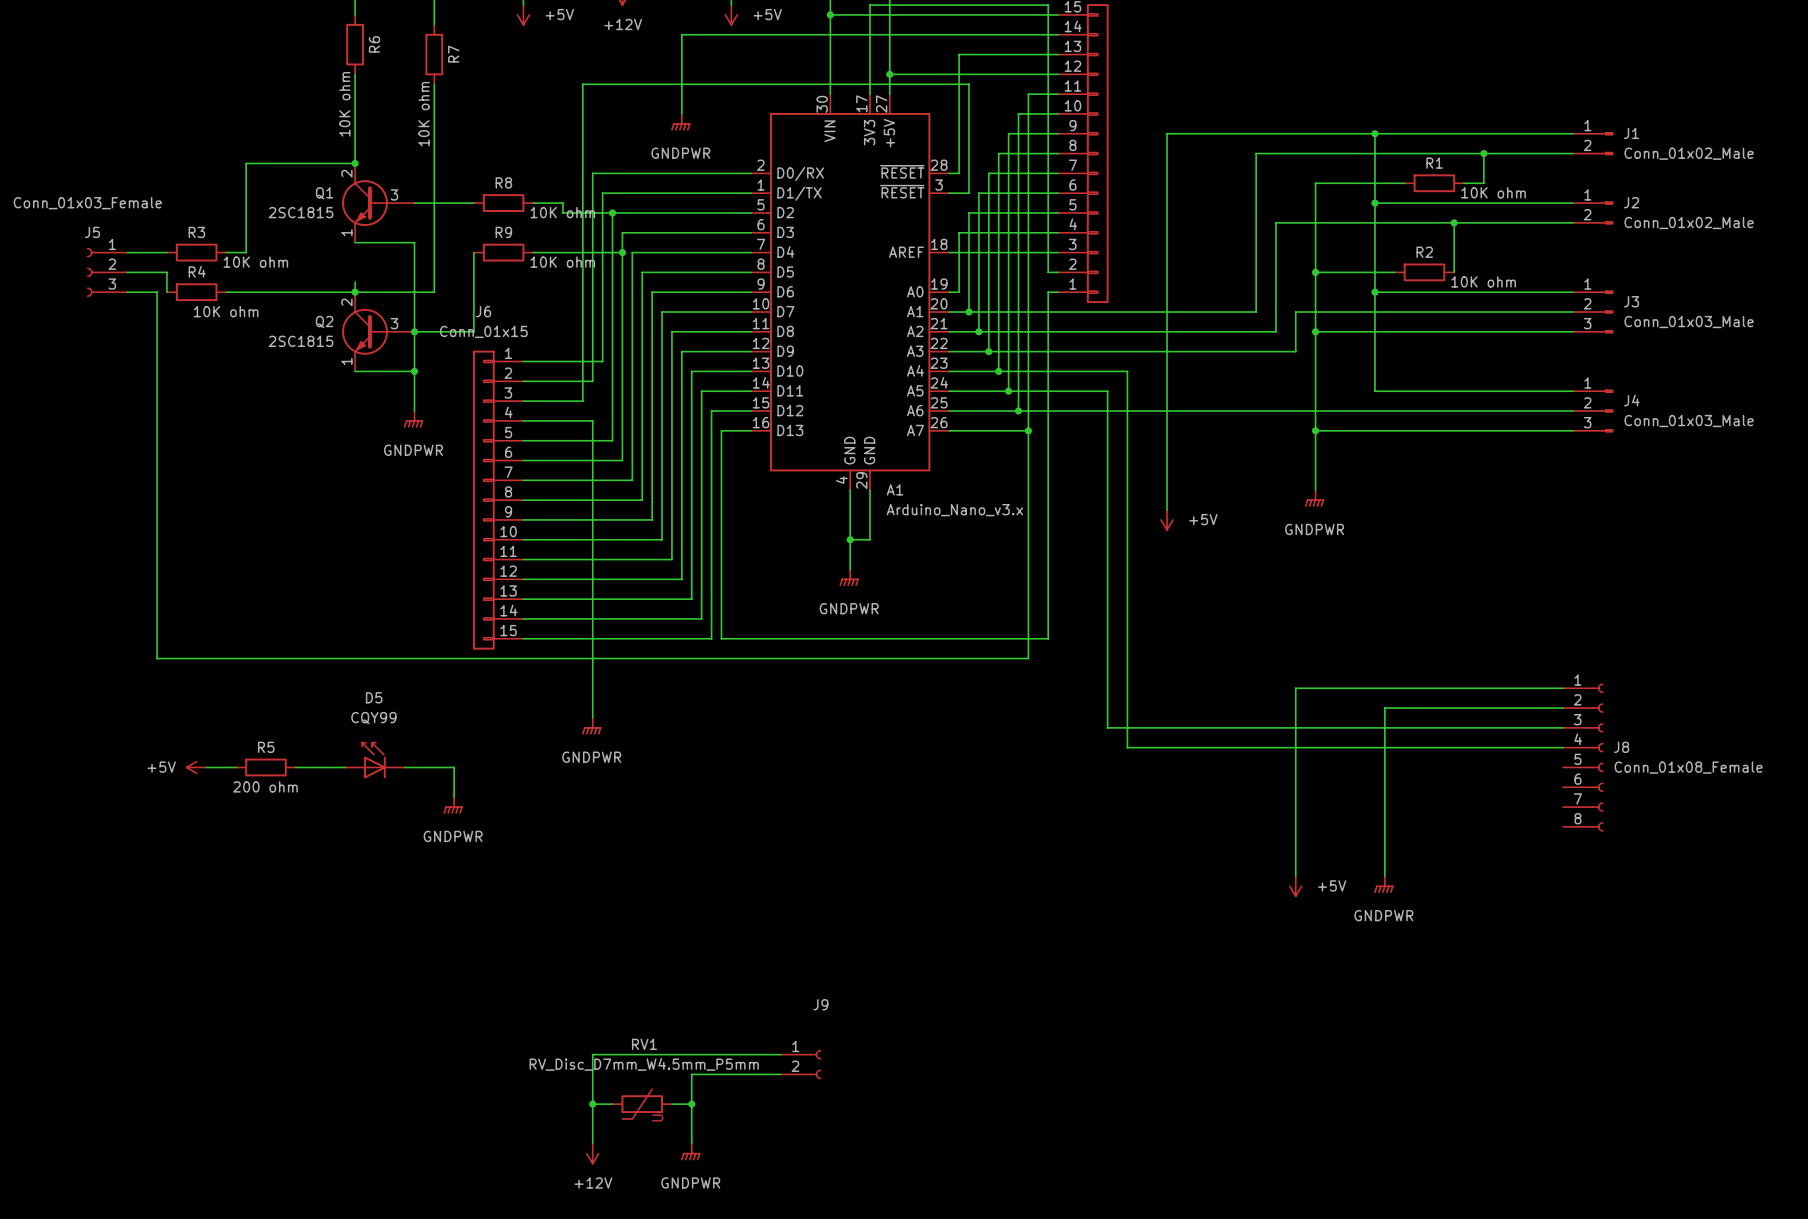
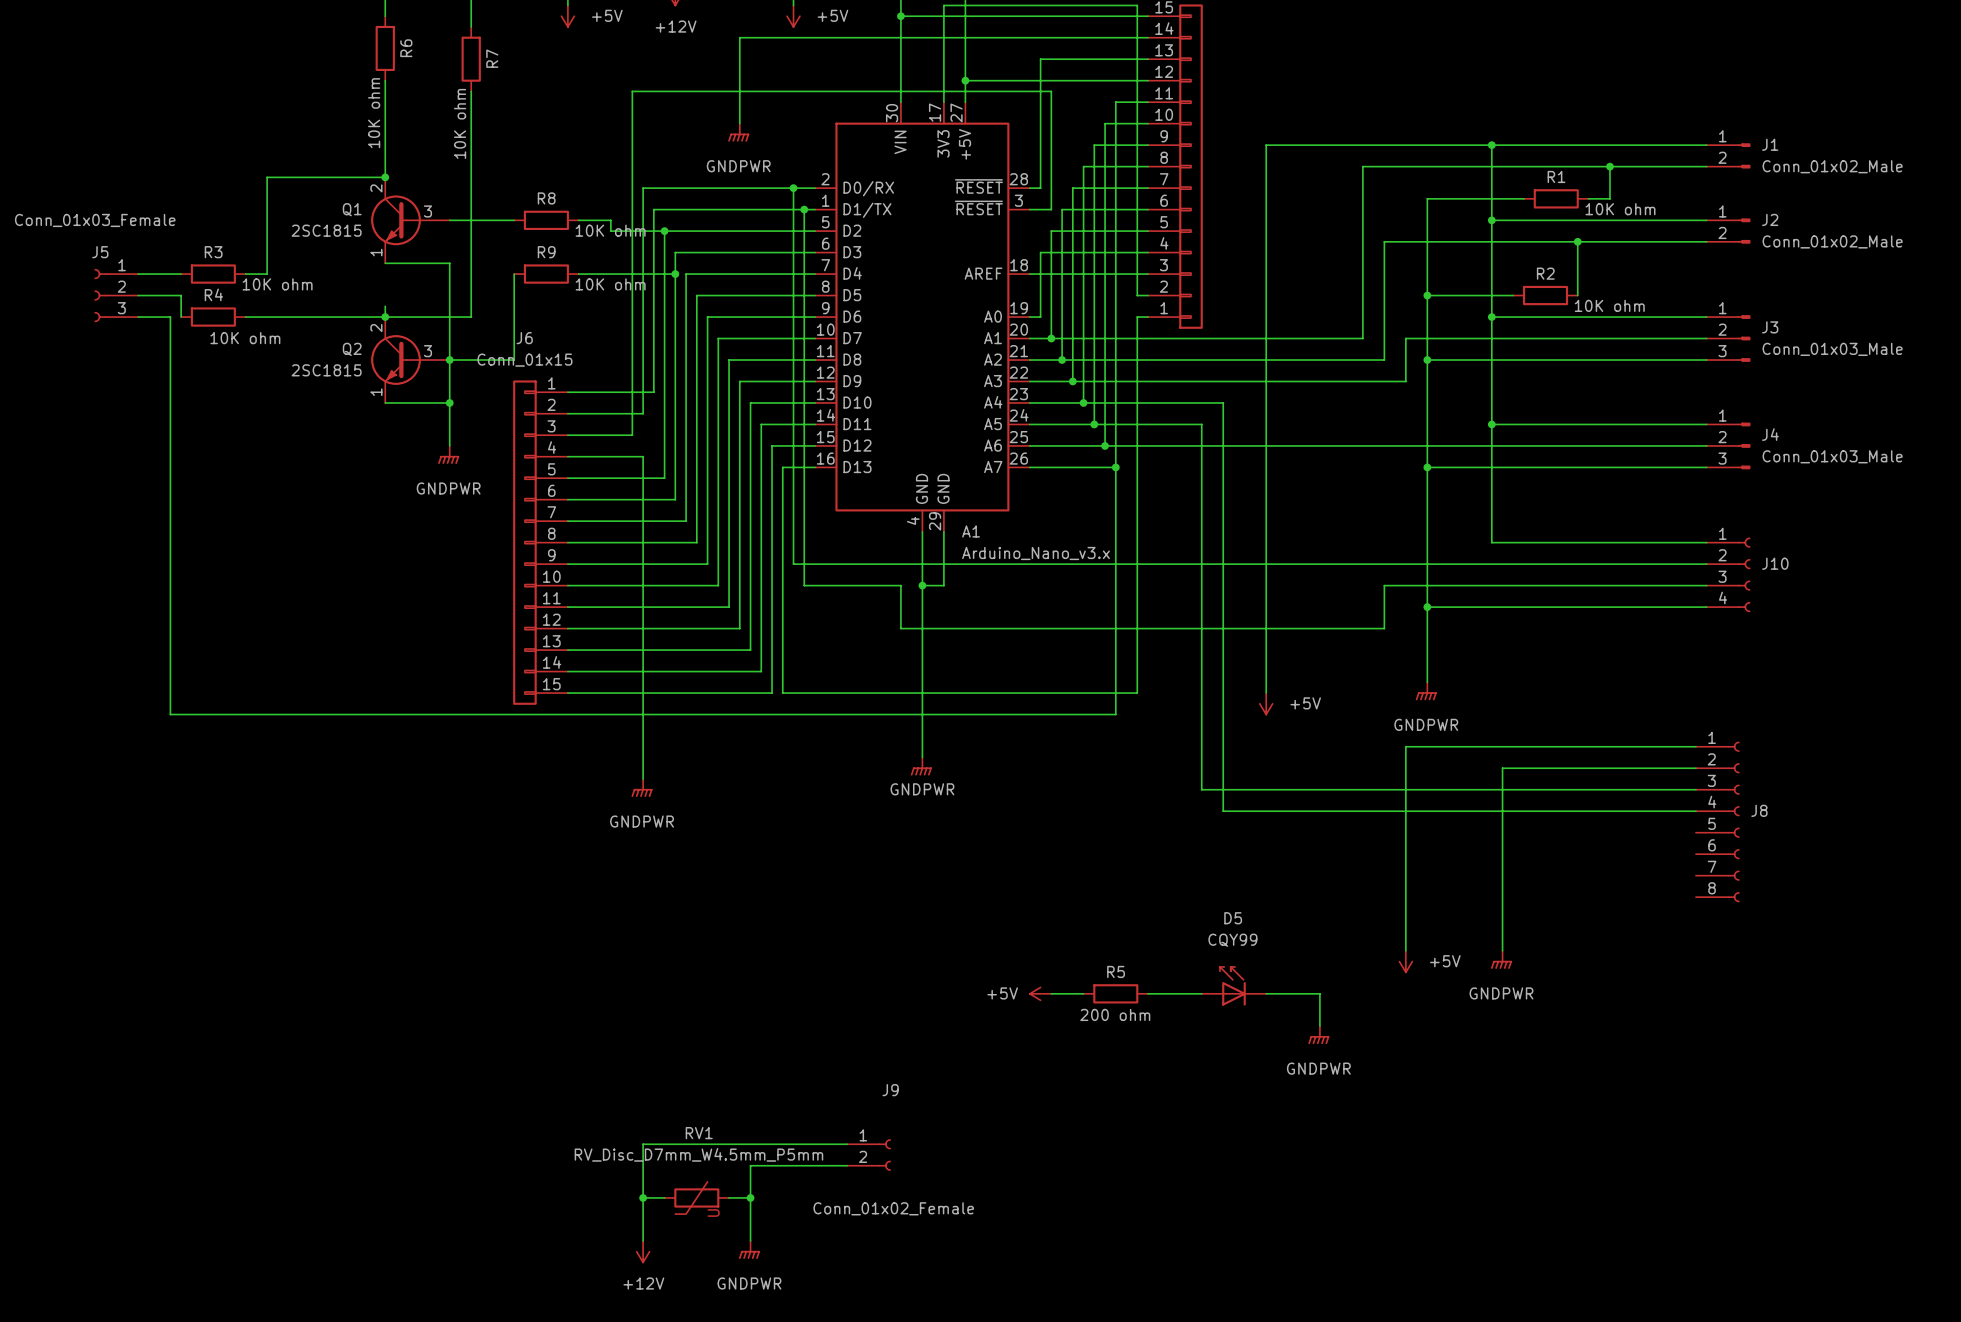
wire: none -> (793, 188) (793, 564) (1706, 564)
junction: none -> (793, 188)
wire: none -> (804, 209) (804, 585) (900, 585) (900, 628) (1384, 628) (1384, 585) (1706, 585)
junction: none -> (804, 209)
wire: none -> (1491, 424) (1491, 542) (1706, 542)
junction: none -> (1491, 424)
wire: none -> (1427, 531) (1427, 682)
power symbol position: GNDPWR (1314, 498) -> GNDPWR (1426, 691)
wire: none -> (1266, 553) (1266, 693)
power symbol position: +5V (1167, 519) -> +5V (1266, 703)
J10: none -> (1728, 574)
wire: none -> (1427, 607) (1706, 607)
junction: none -> (1427, 607)
wire: none -> (922, 617) (922, 757)
power symbol position: GNDPWR (849, 577) -> GNDPWR (921, 766)
power symbol text position: GNDPWR (849, 608) -> GNDPWR (922, 789)
D5 position: (374, 760) -> (1233, 986)
power symbol: +5V (196, 767) -> none
wire: (206, 767) (236, 767) -> none
R5 position: (265, 767) -> (1115, 993)
wire: (295, 767) (345, 767) -> none
wire: (404, 767) (454, 767) (454, 797) -> none
J8 value: Conn_01x08_Female (1688, 767) -> none
power symbol: GNDPWR (453, 805) -> none
power symbol: none -> +5V (1040, 993)
wire: none -> (1051, 993) (1083, 993)
wire: none -> (1148, 993) (1201, 993)
wire: none -> (1266, 993) (1319, 993) (1319, 1026)
power symbol: none -> GNDPWR (1318, 1035)
J9 value: none -> Conn_01x02_Female (893, 1208)

